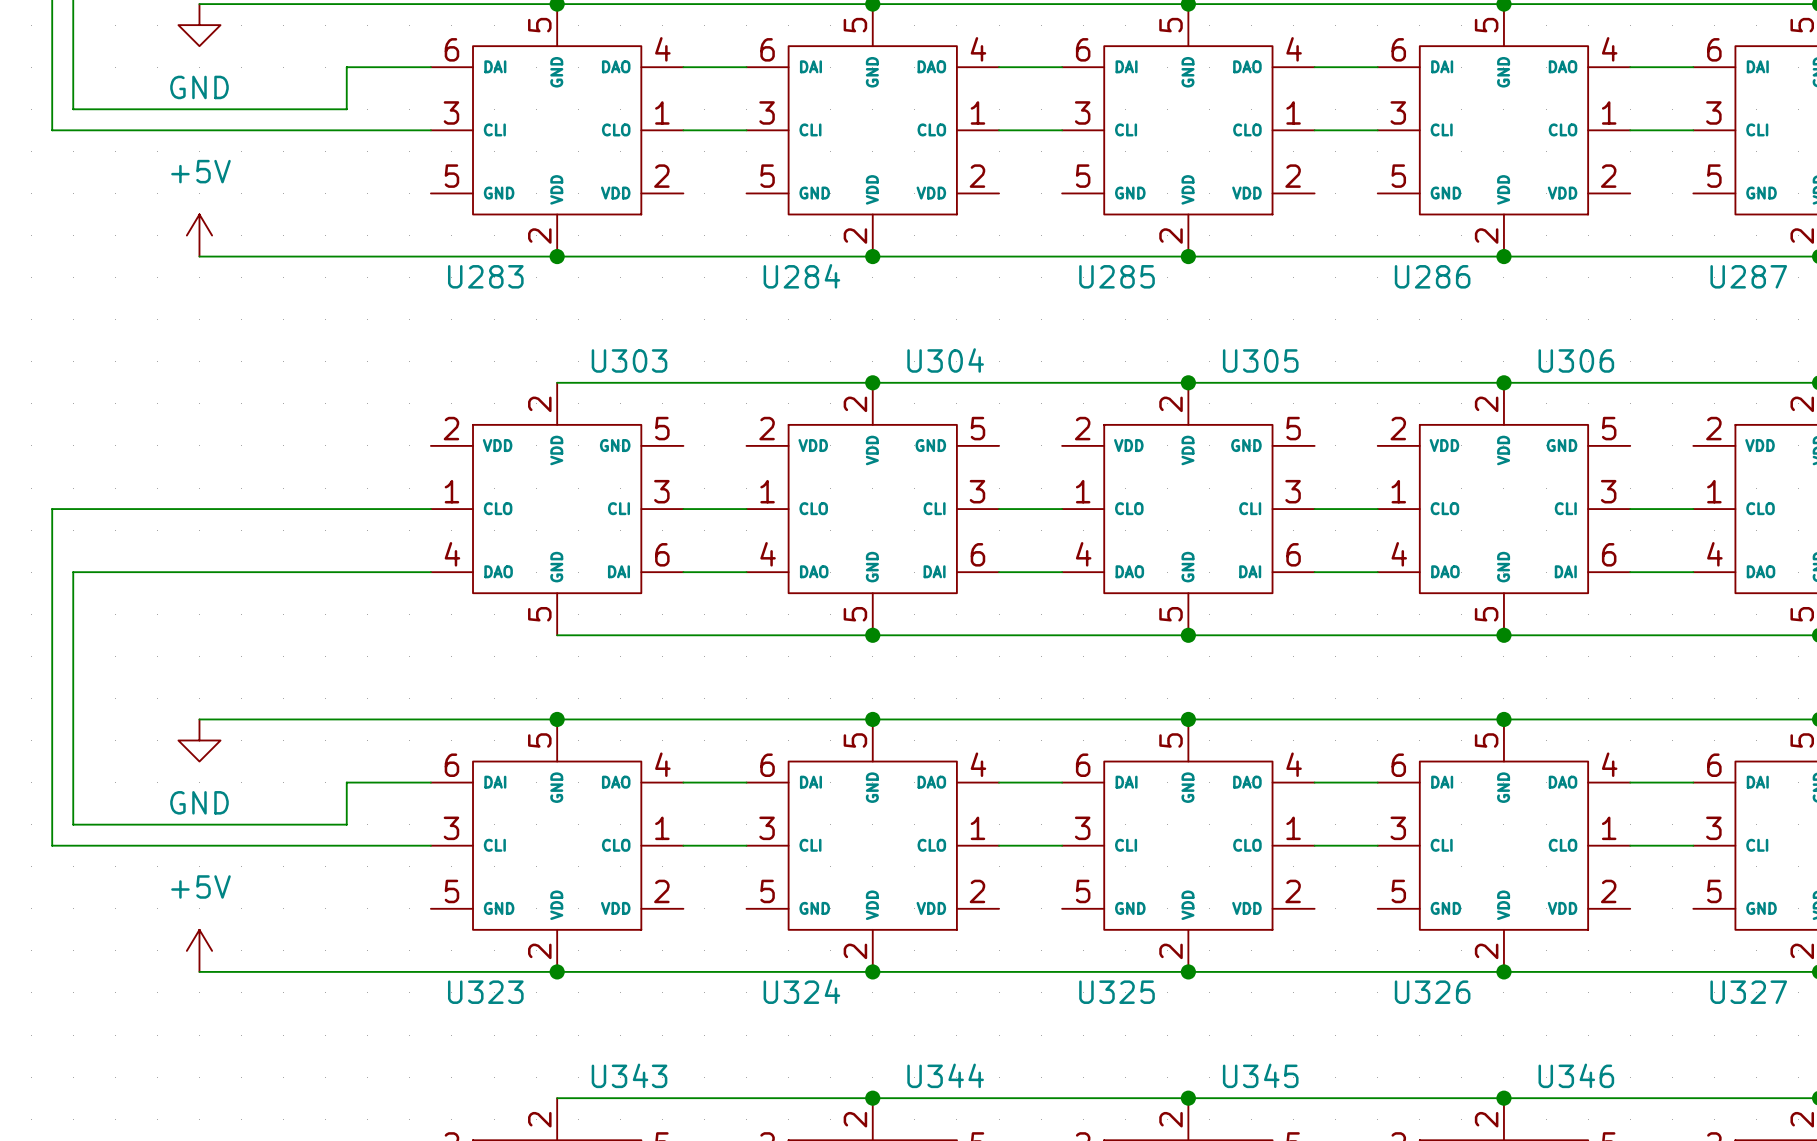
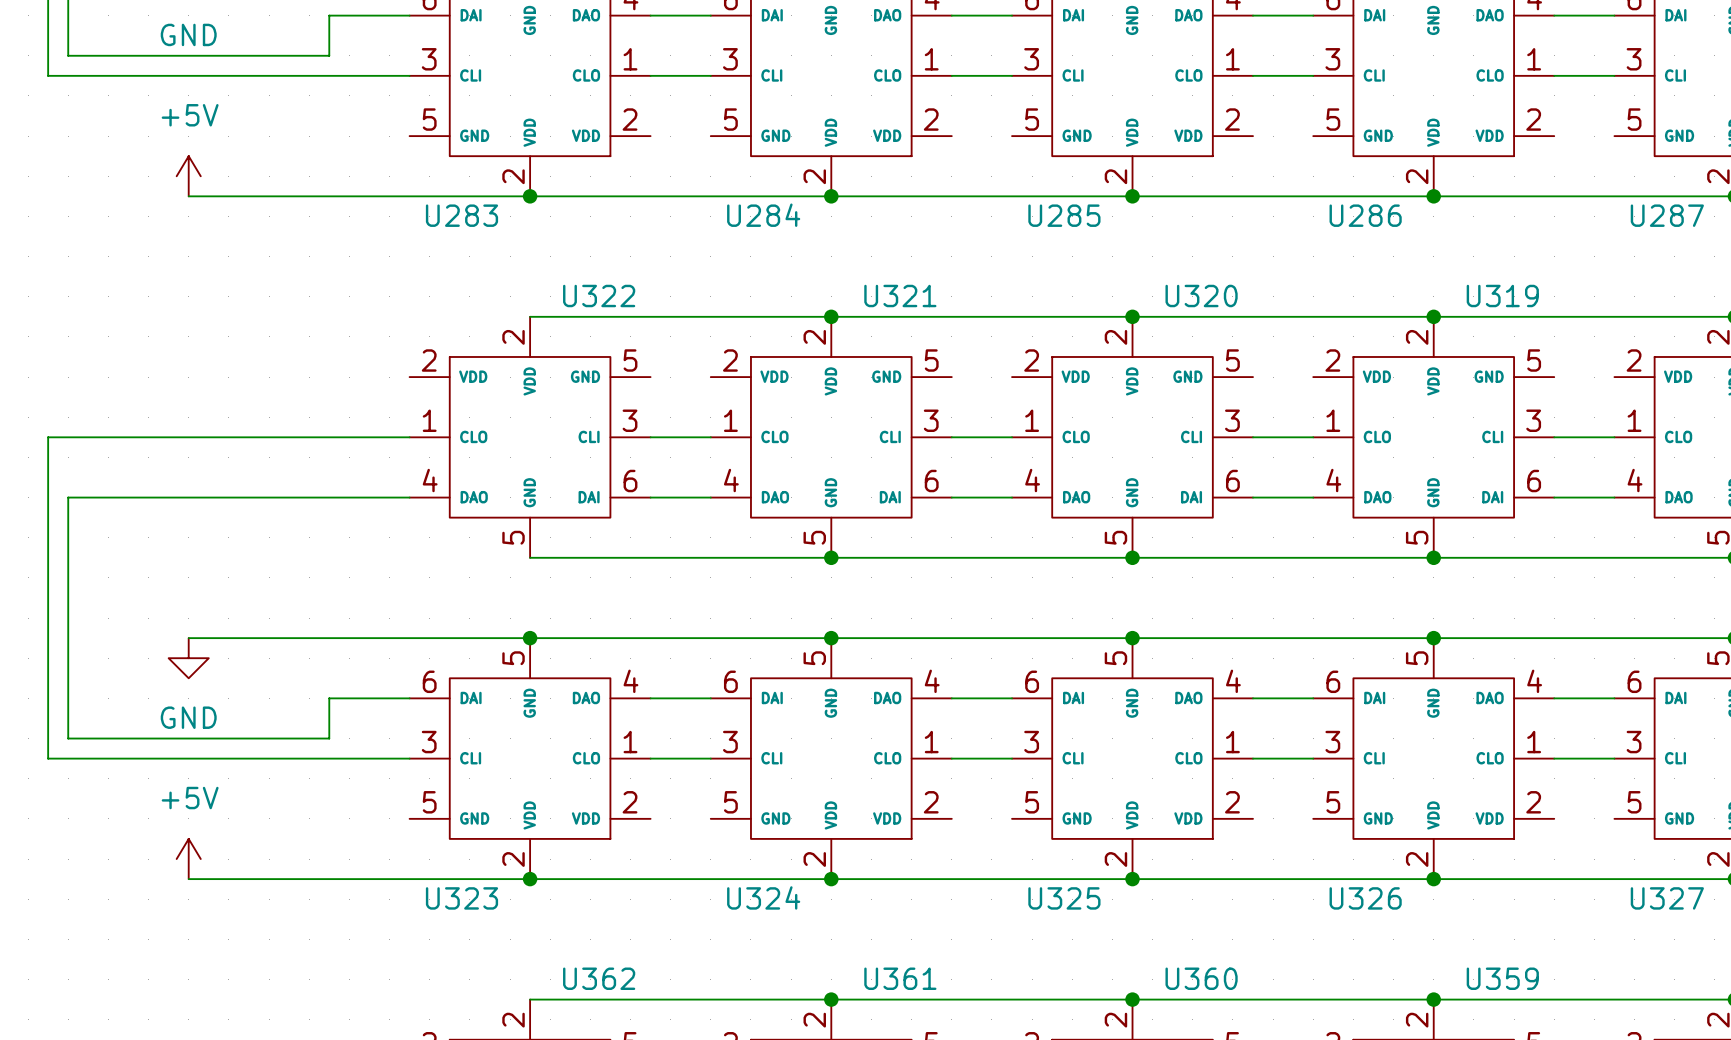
U303 name: U303 (629, 360) -> U322 (599, 296)
U304 name: U304 (945, 360) -> U321 (900, 296)
U305 name: U305 (1260, 360) -> U320 (1201, 296)
U306 name: U306 (1576, 360) -> U319 (1502, 296)
U343 name: U343 (629, 1075) -> U362 (599, 978)
U344 name: U344 (945, 1075) -> U361 (900, 978)
U345 name: U345 (1260, 1075) -> U360 (1201, 978)
U346 name: U346 (1576, 1075) -> U359 (1502, 978)

